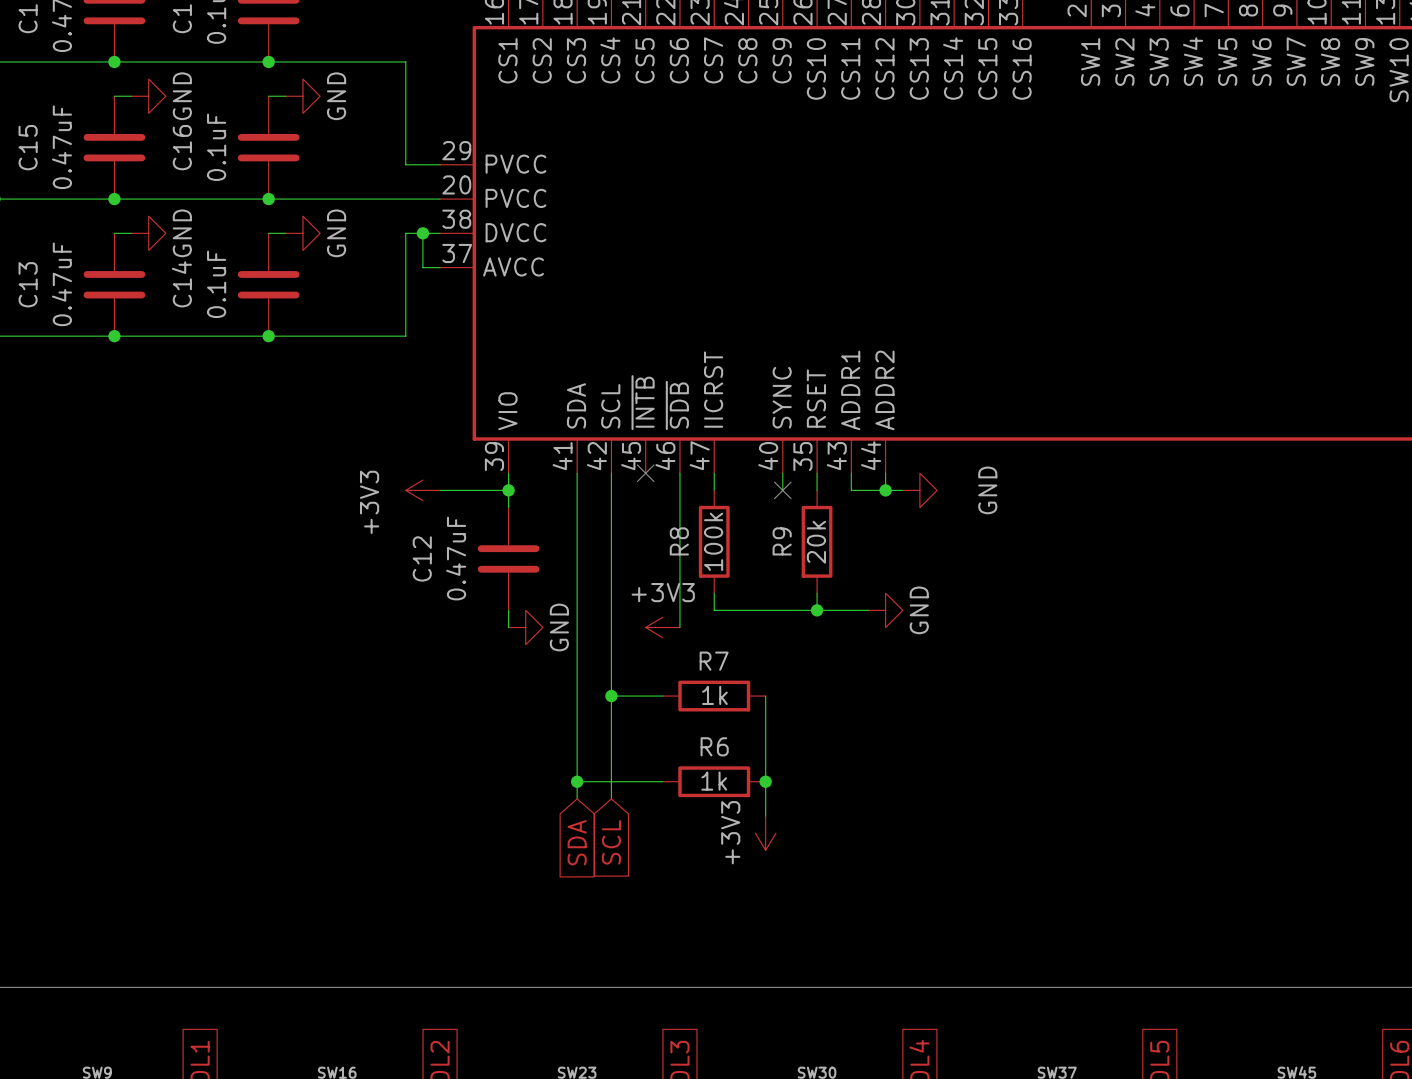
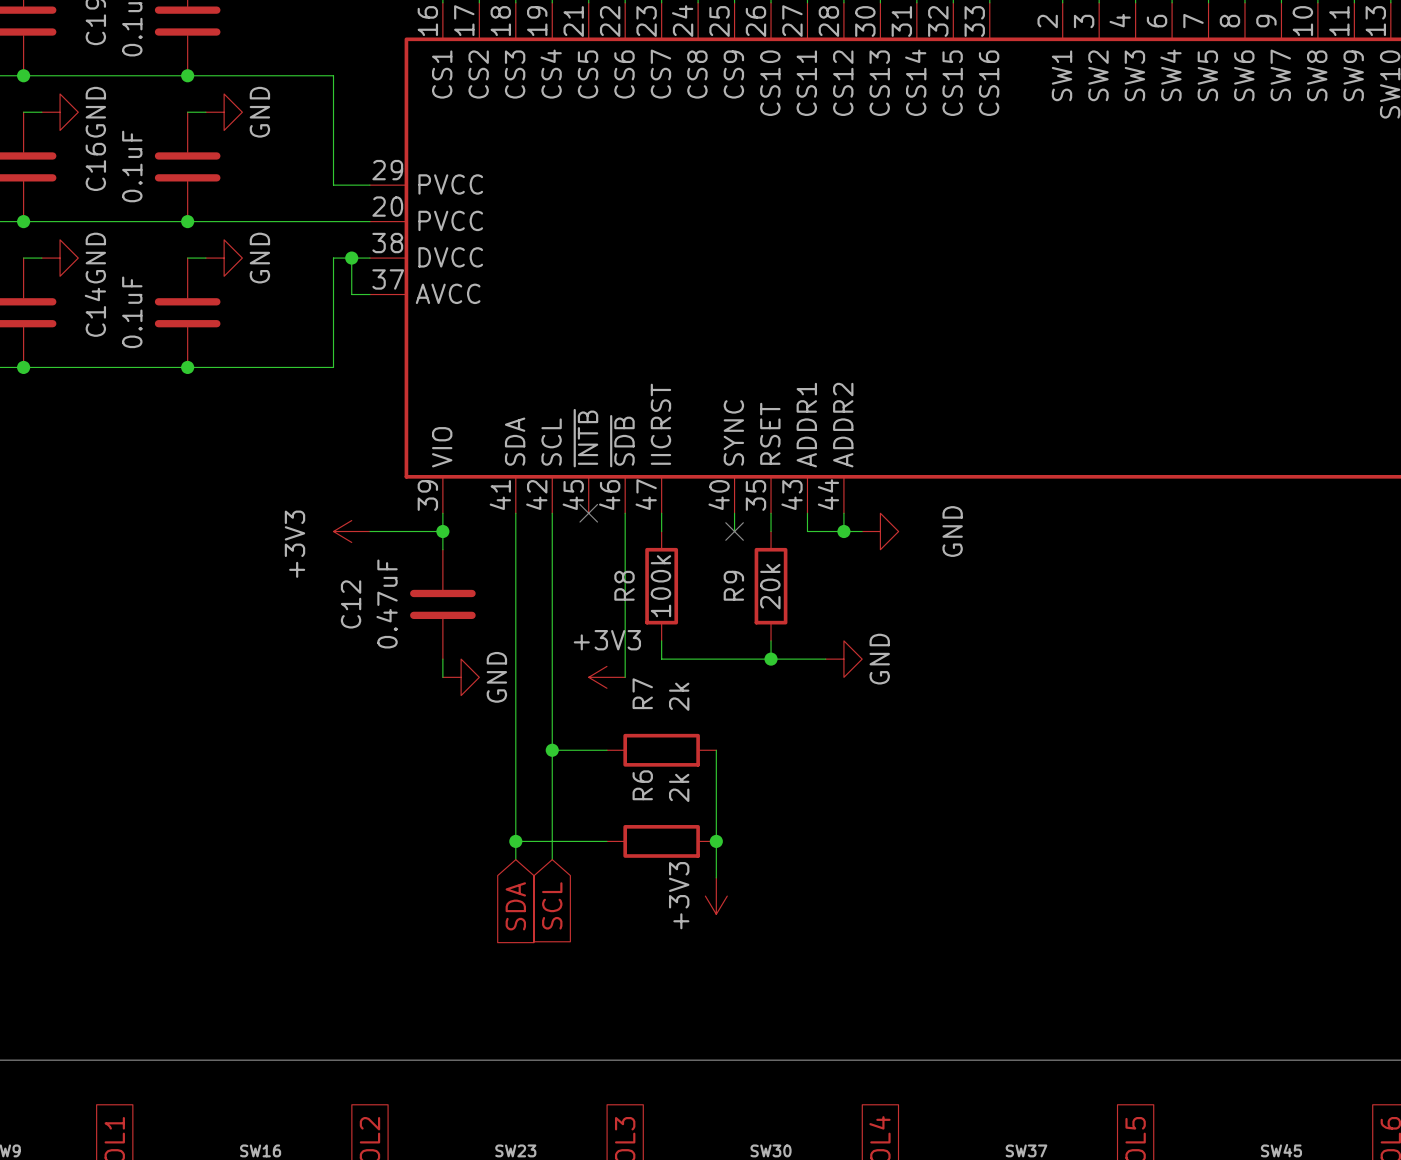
R7 name rotation: 0° (714, 661) -> 90° counterclockwise (642, 693)
R7 value: 1k (714, 695) -> 2k (679, 696)
R6 name rotation: 0° (714, 746) -> 90° counterclockwise (642, 785)
R6 value: 1k (714, 781) -> 2k (679, 787)

